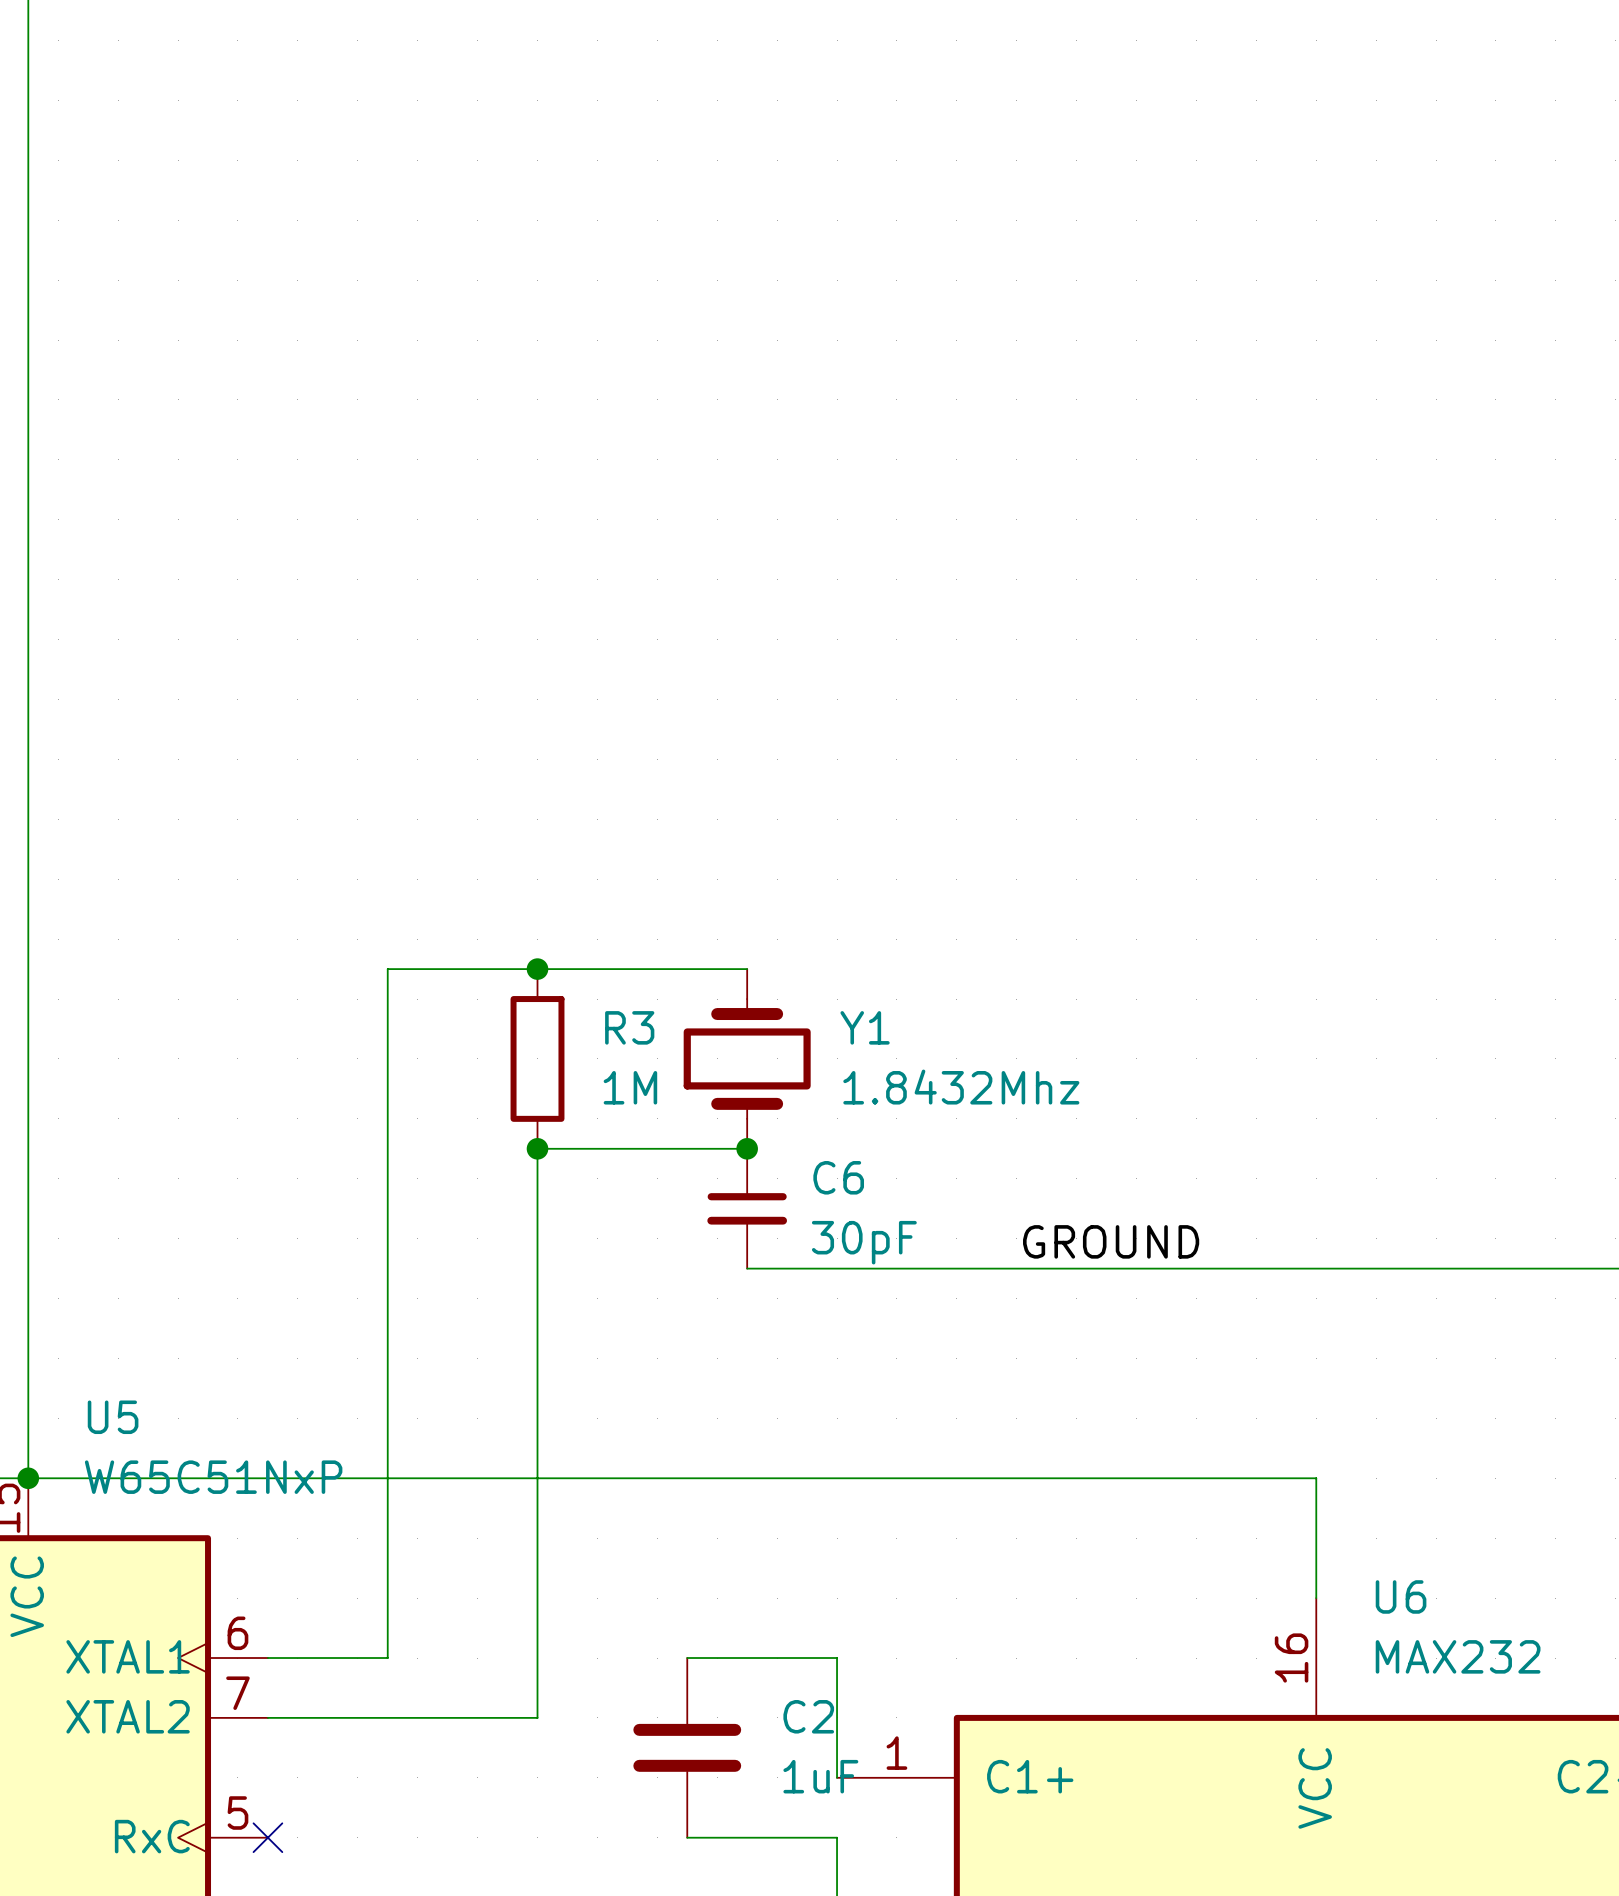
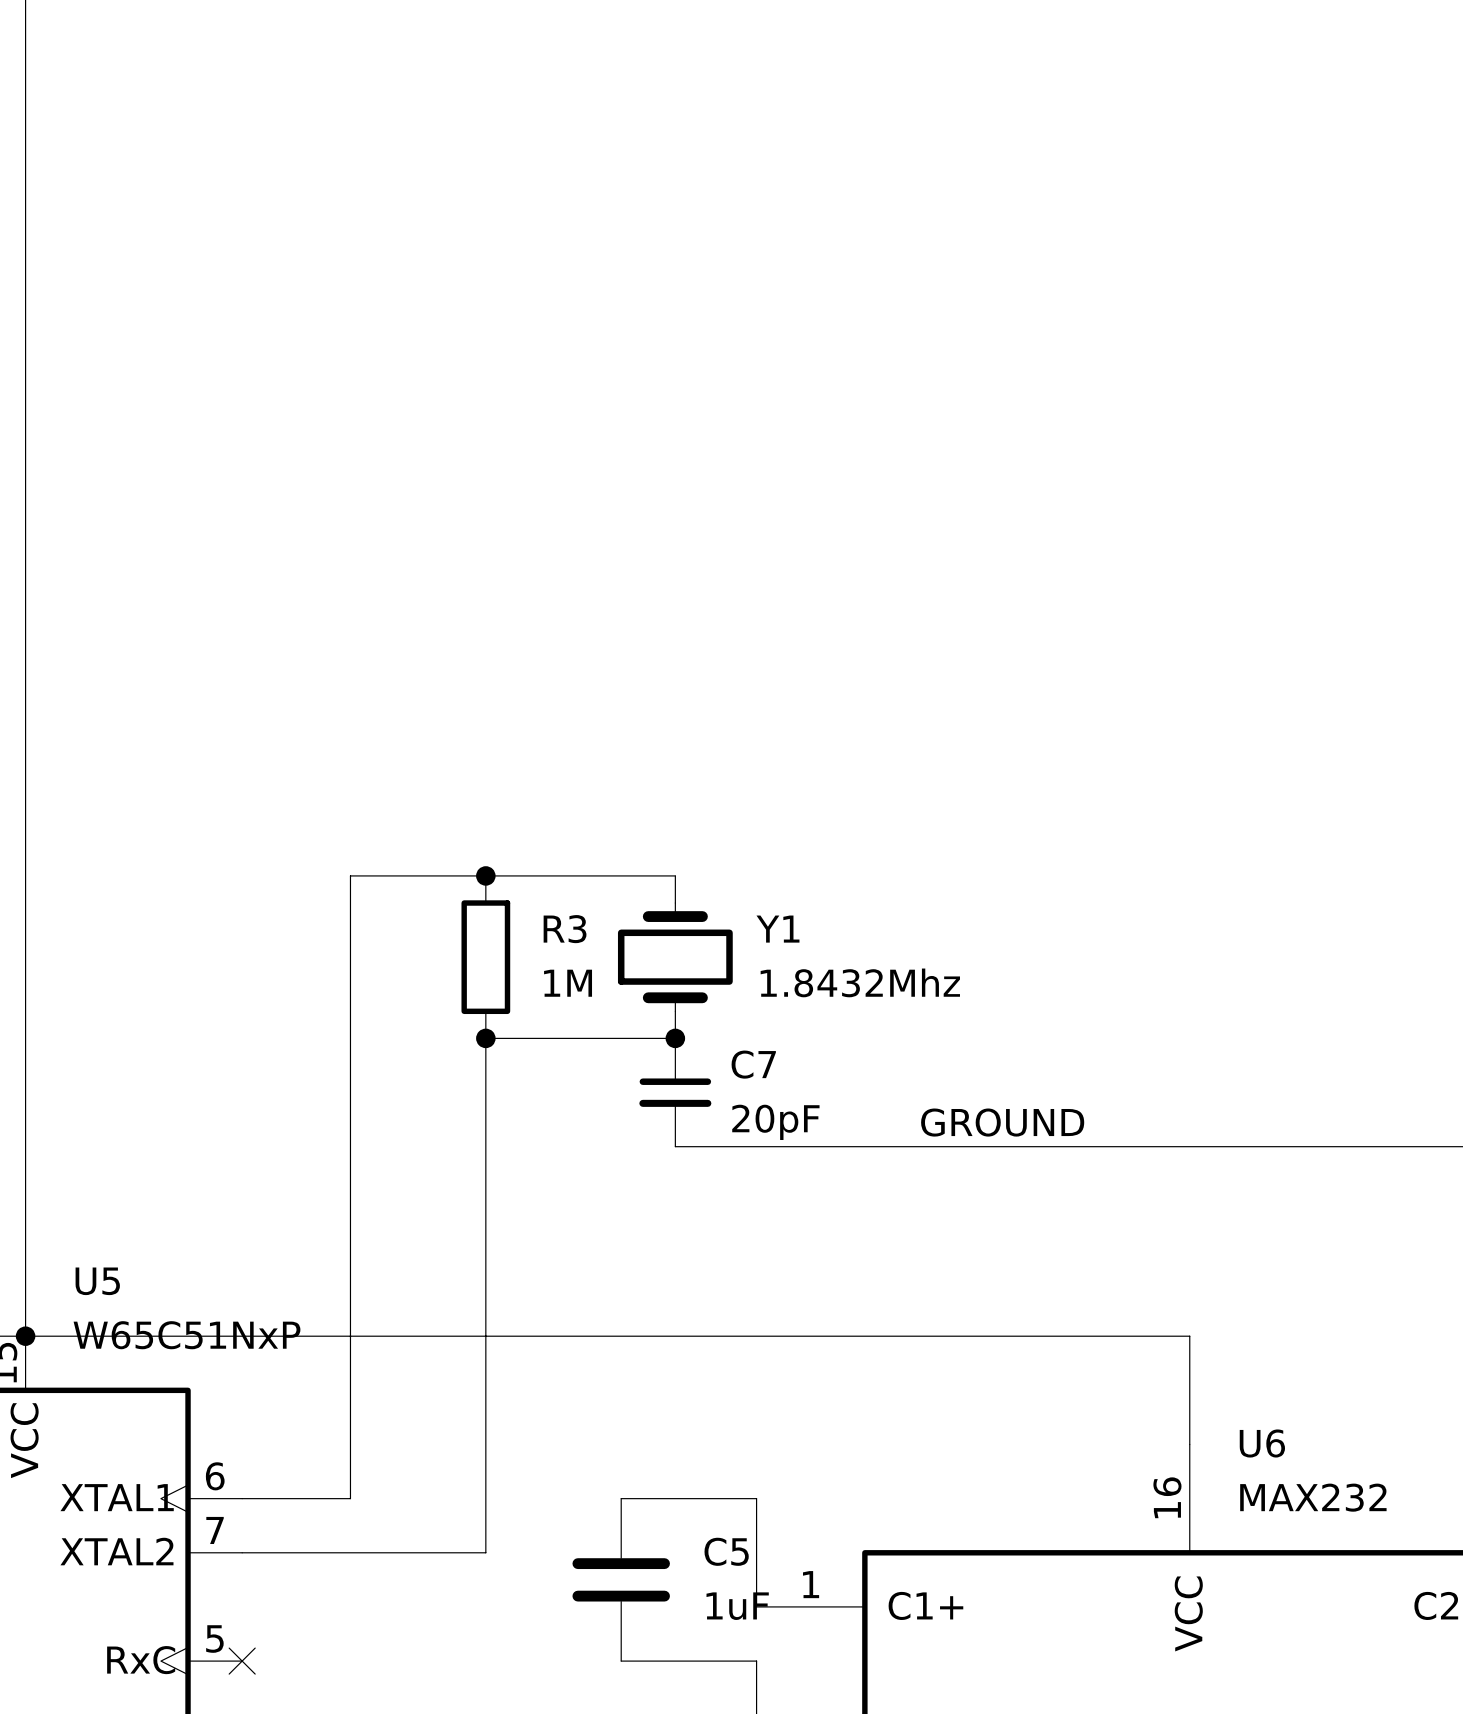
C6 name: C6 (838, 1177) -> C7 (753, 1064)
C6 value: 30pF (864, 1242) -> 20pF (775, 1122)
C2 name: C2 (808, 1716) -> C5 (726, 1551)

